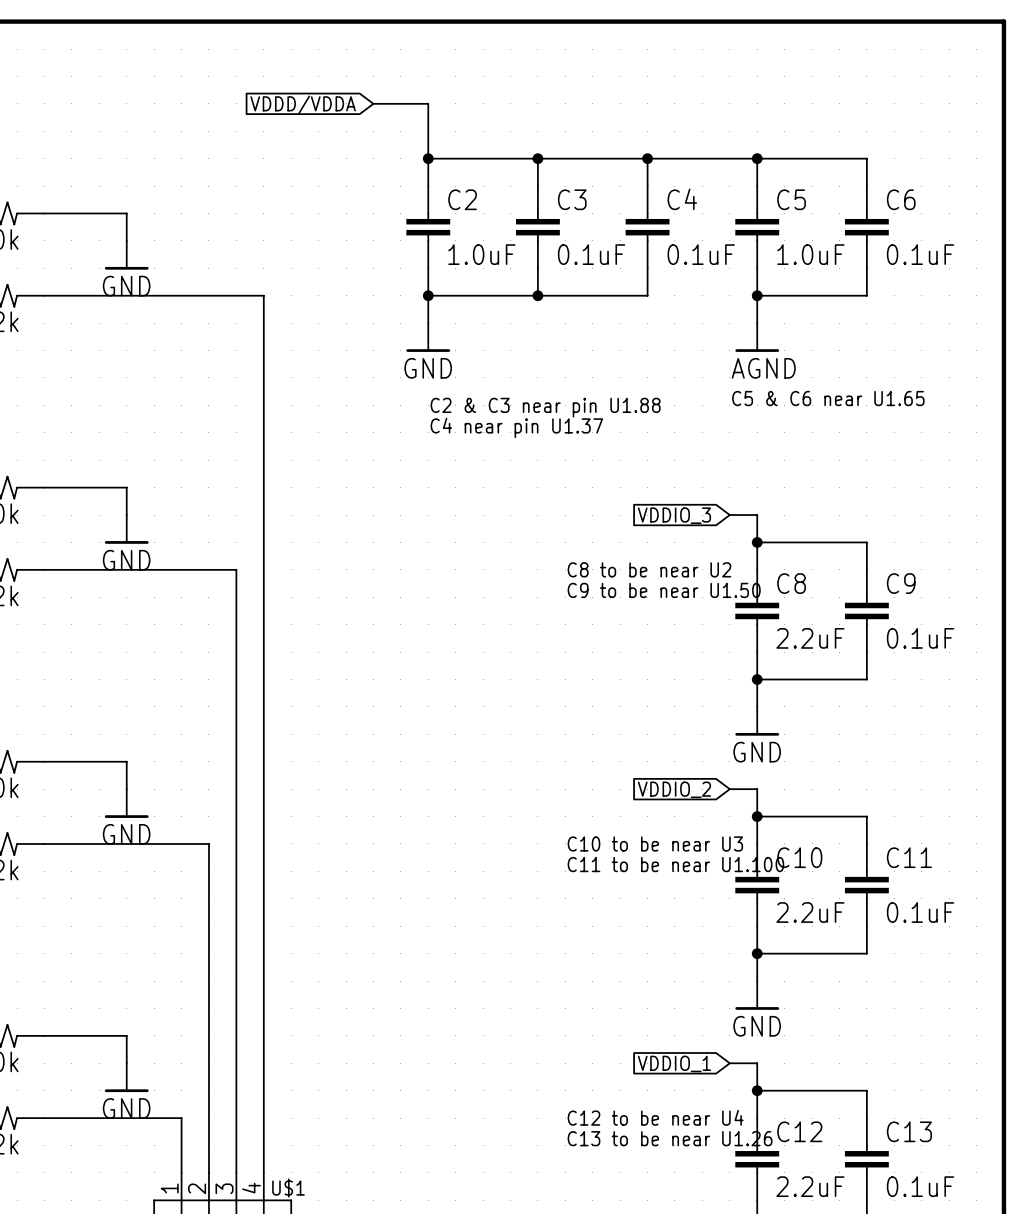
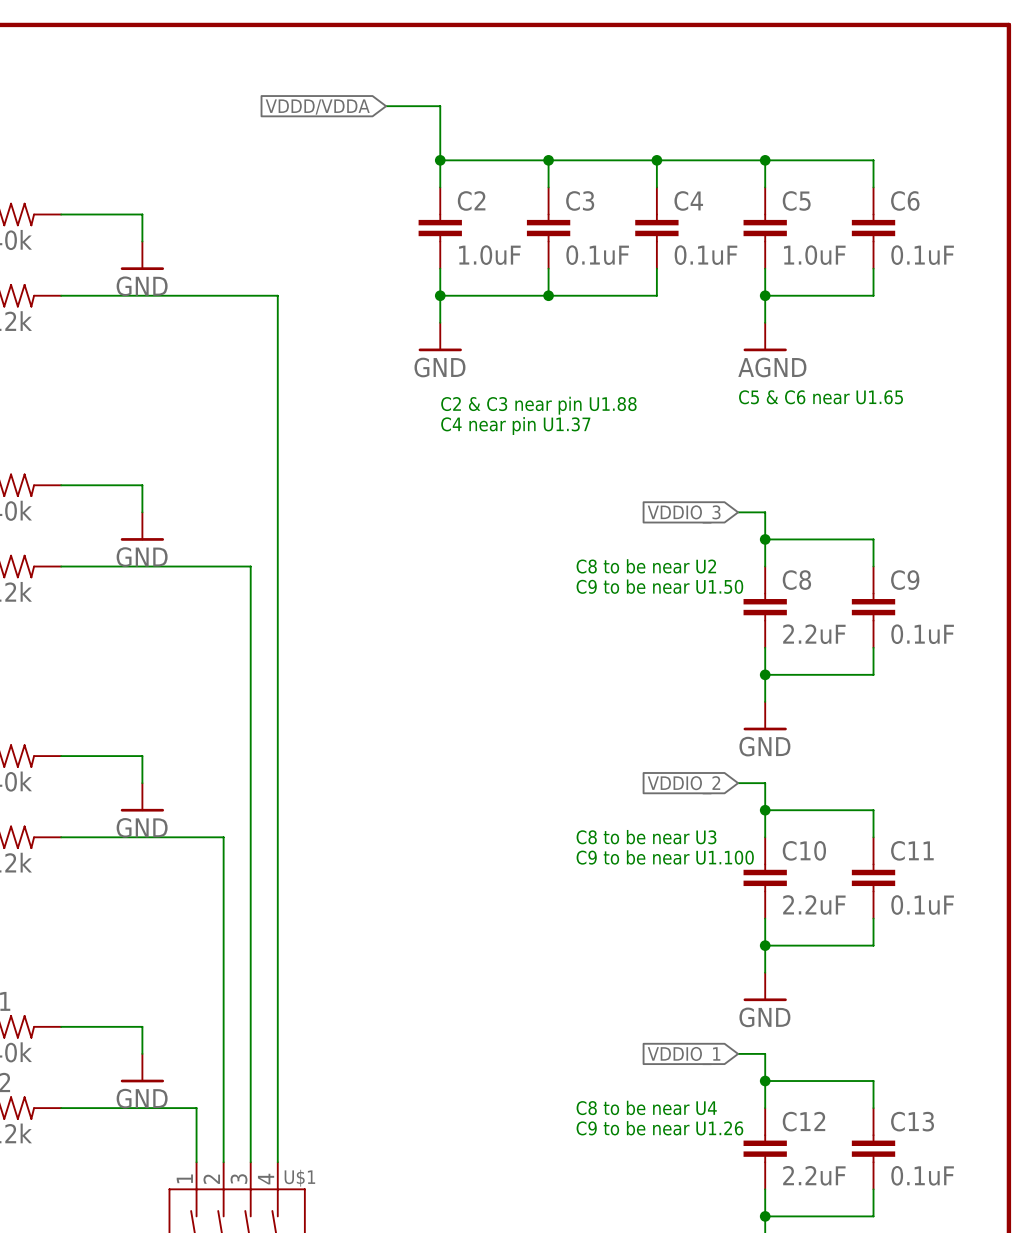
text: C10 to be near U3 (655, 843) -> C8 to be near U3 (646, 837)
text: C11 to be near U1.100 (675, 864) -> C9 to be near U1.100 (665, 857)
text: C12 to be near U4 (655, 1117) -> C8 to be near U4 (646, 1107)
text: C13 to be near U1.26 (670, 1138) -> C9 to be near U1.26 (659, 1128)

